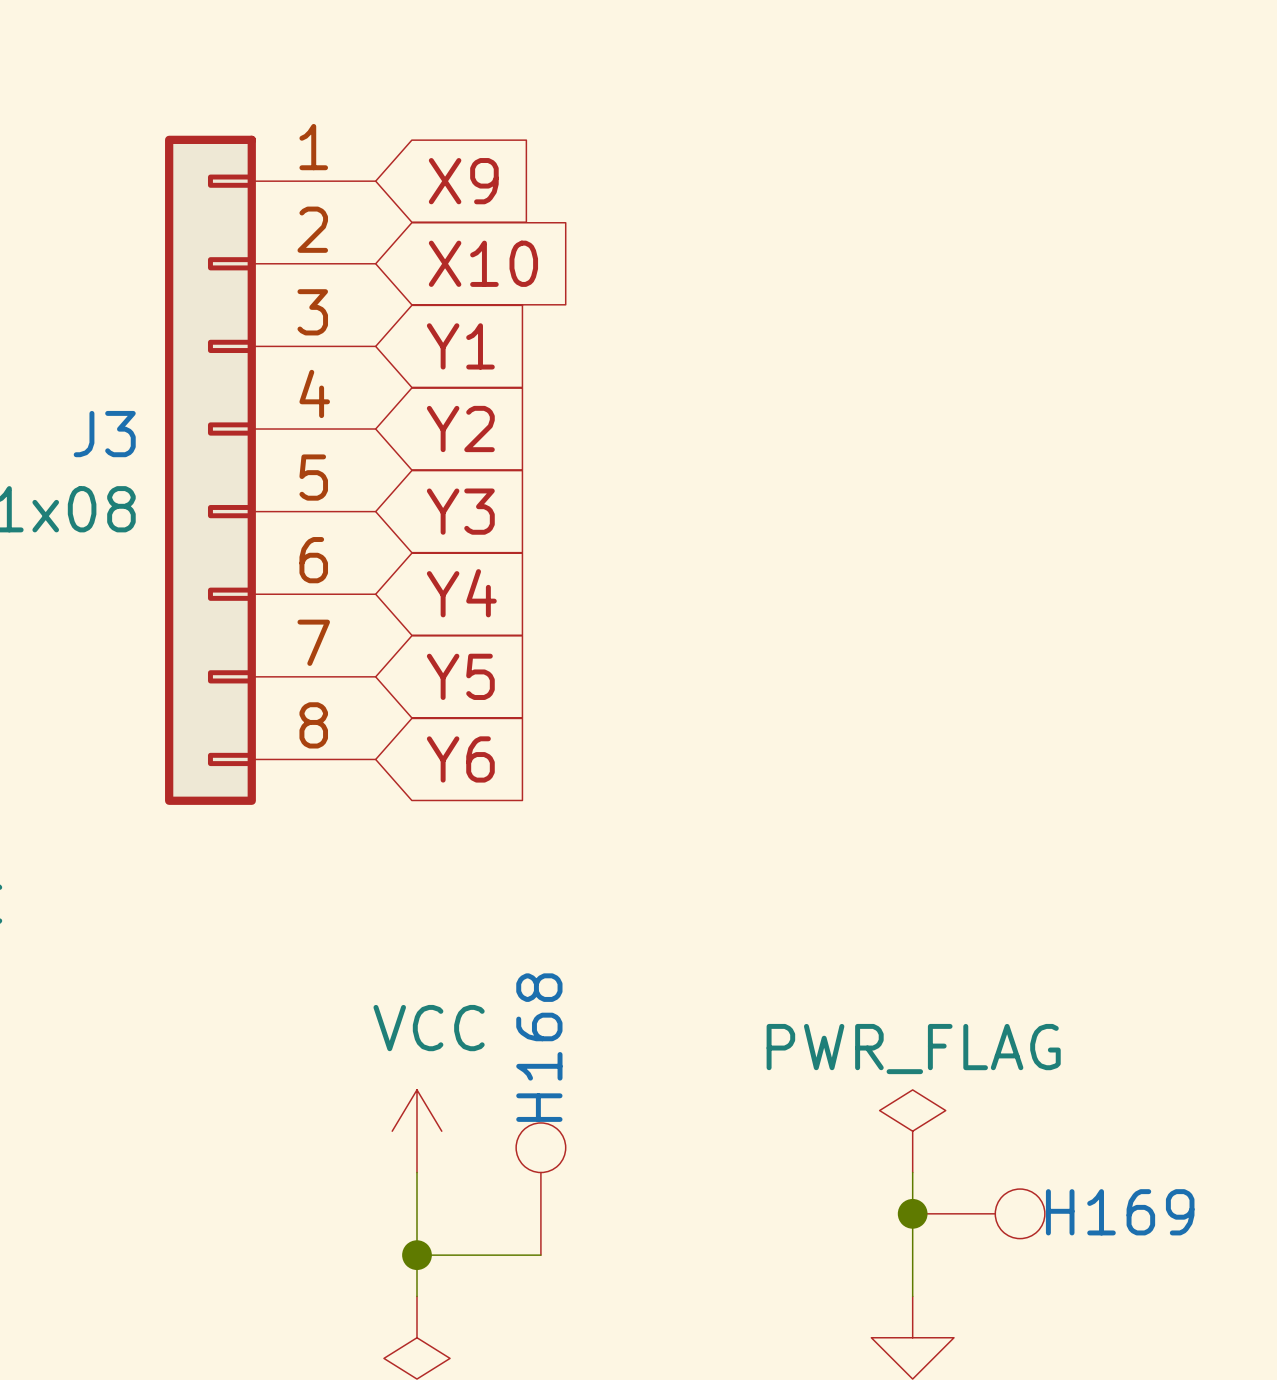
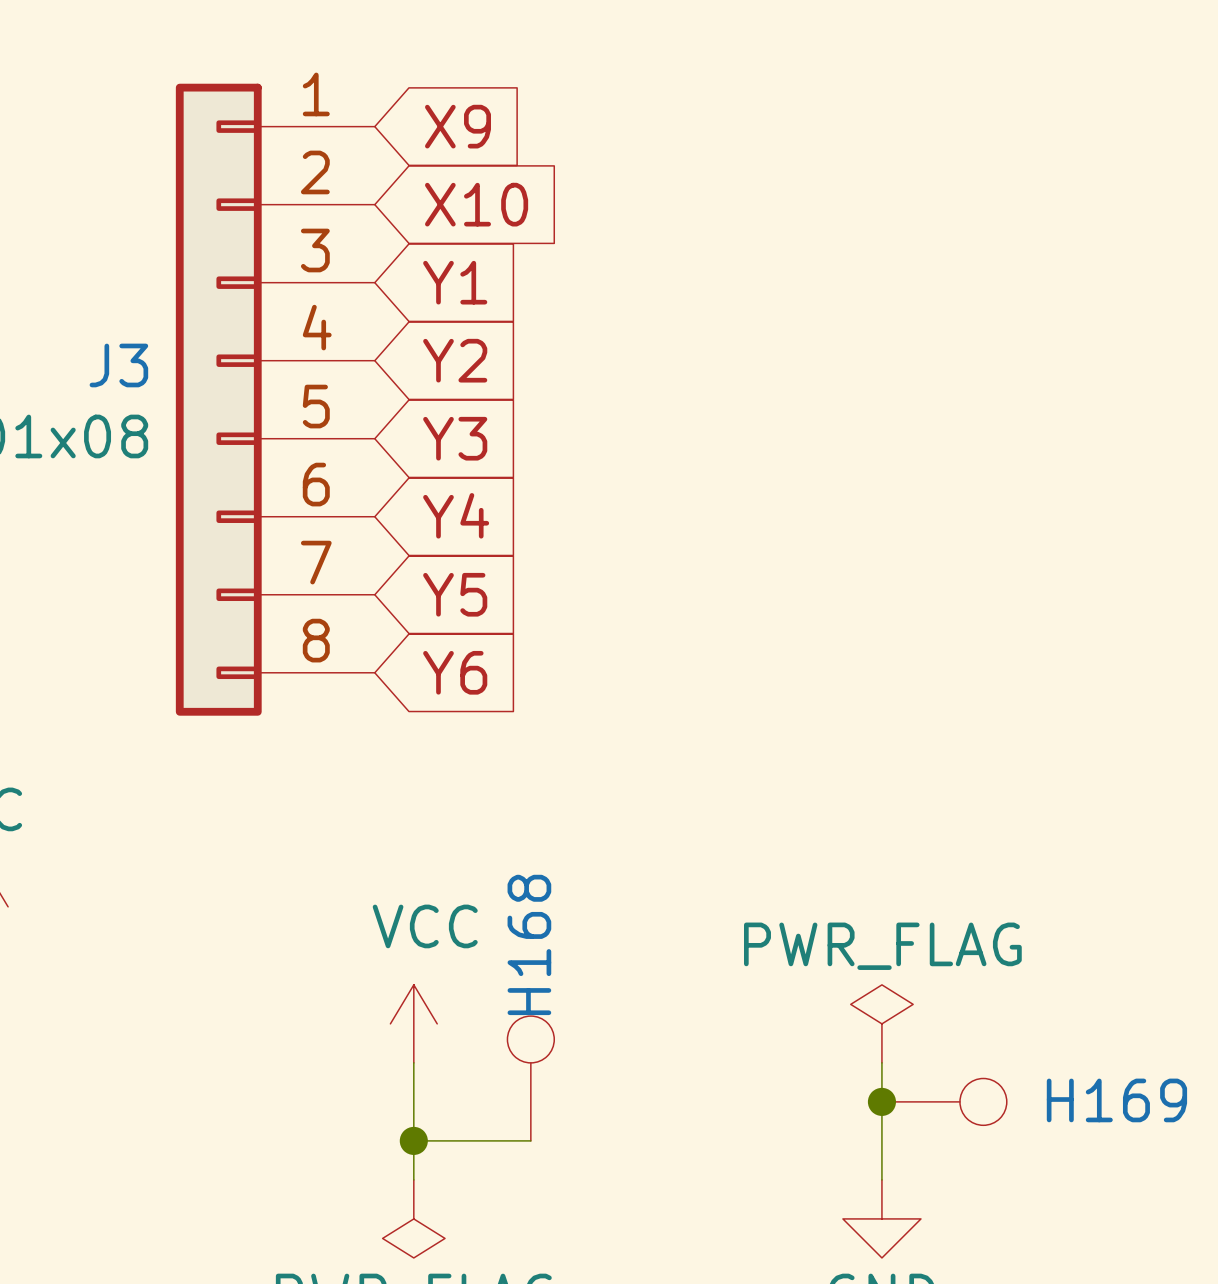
H169 name position: H169 (1120, 1212) -> H169 (1116, 1100)

